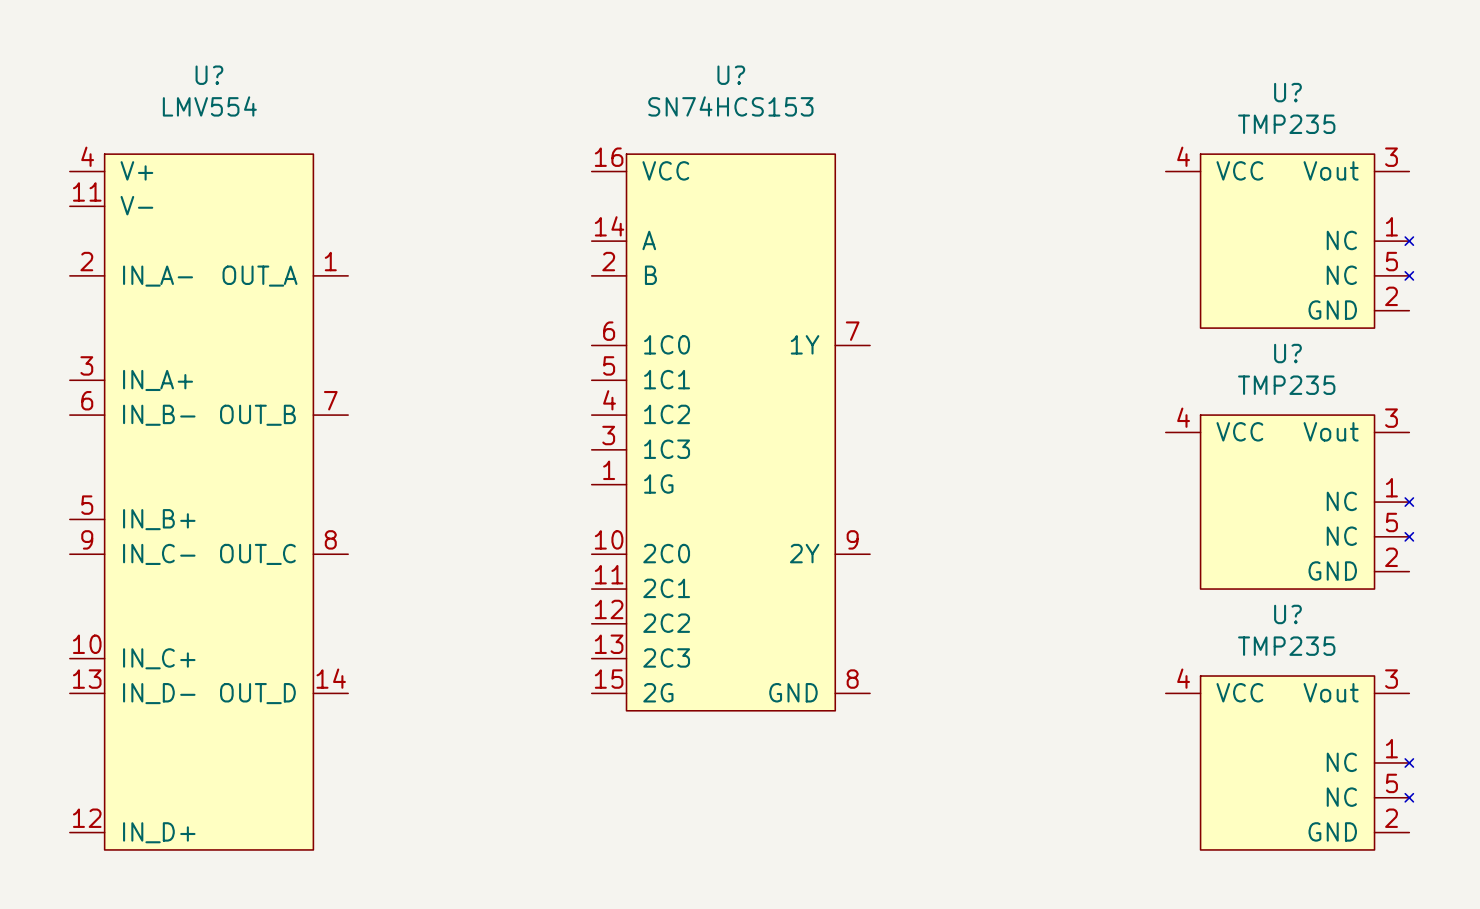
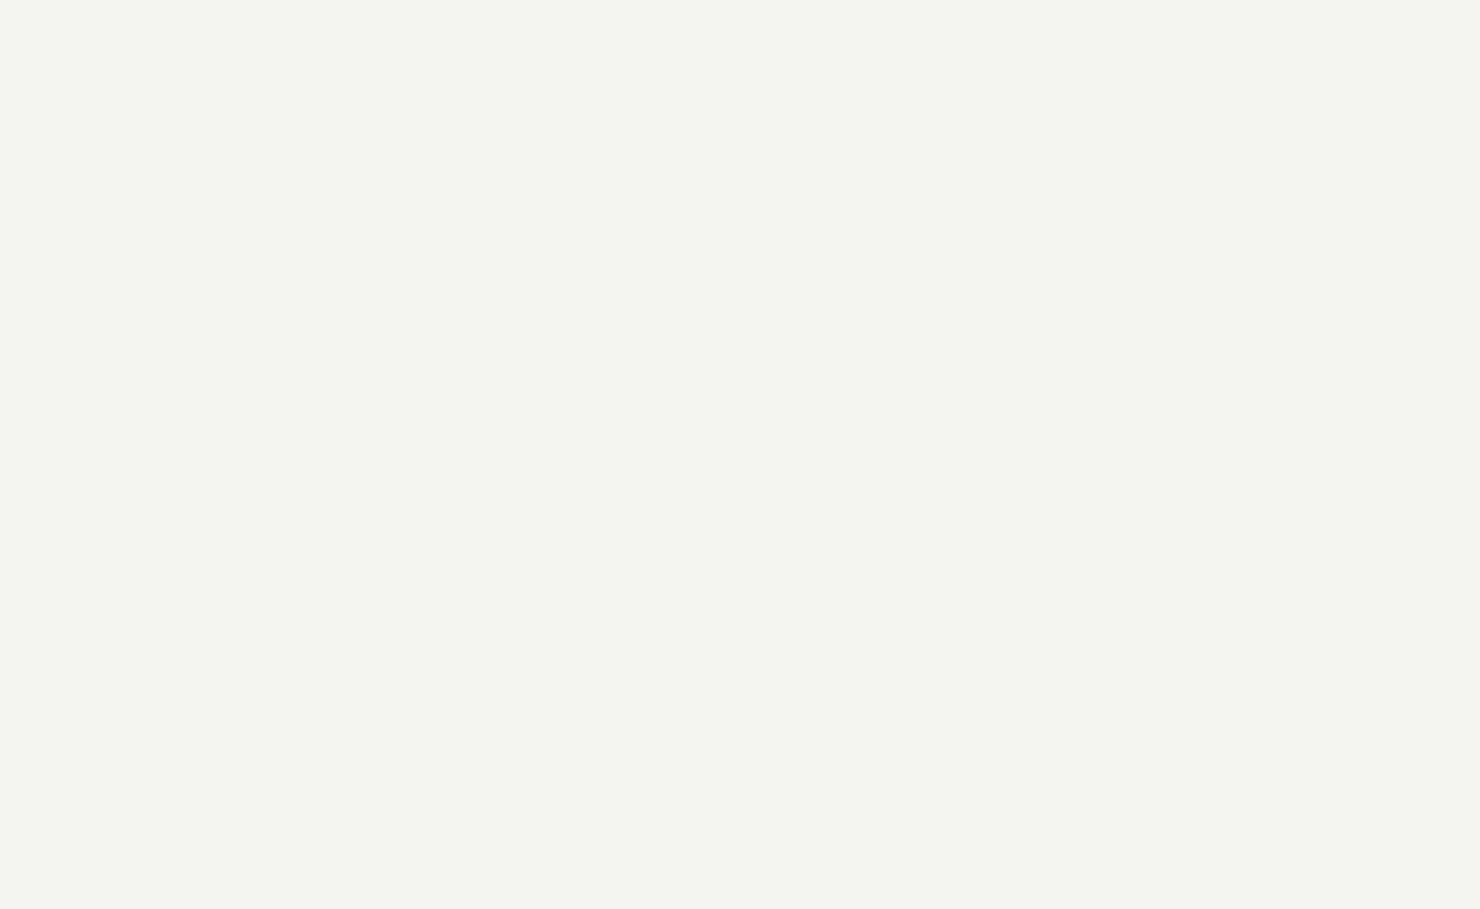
U?: TMP235 (1289, 241) -> none
U?: SN74HCS153 (730, 432) -> none
U?: LMV554 (209, 502) -> none
U?: TMP235 (1289, 502) -> none
U?: TMP235 (1289, 762) -> none

